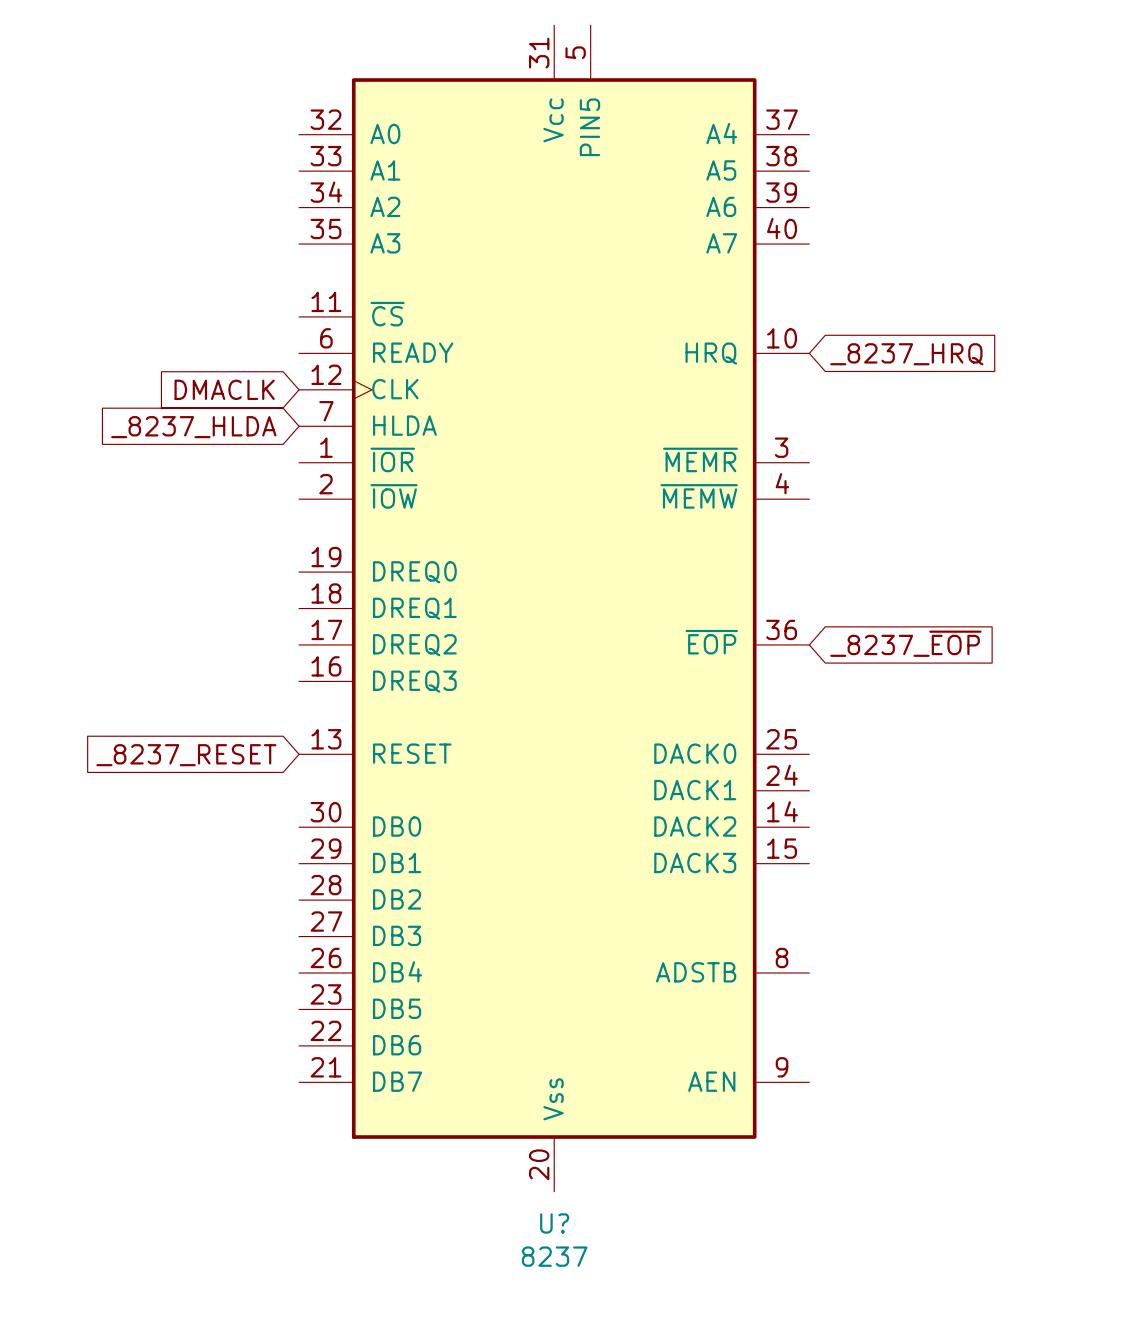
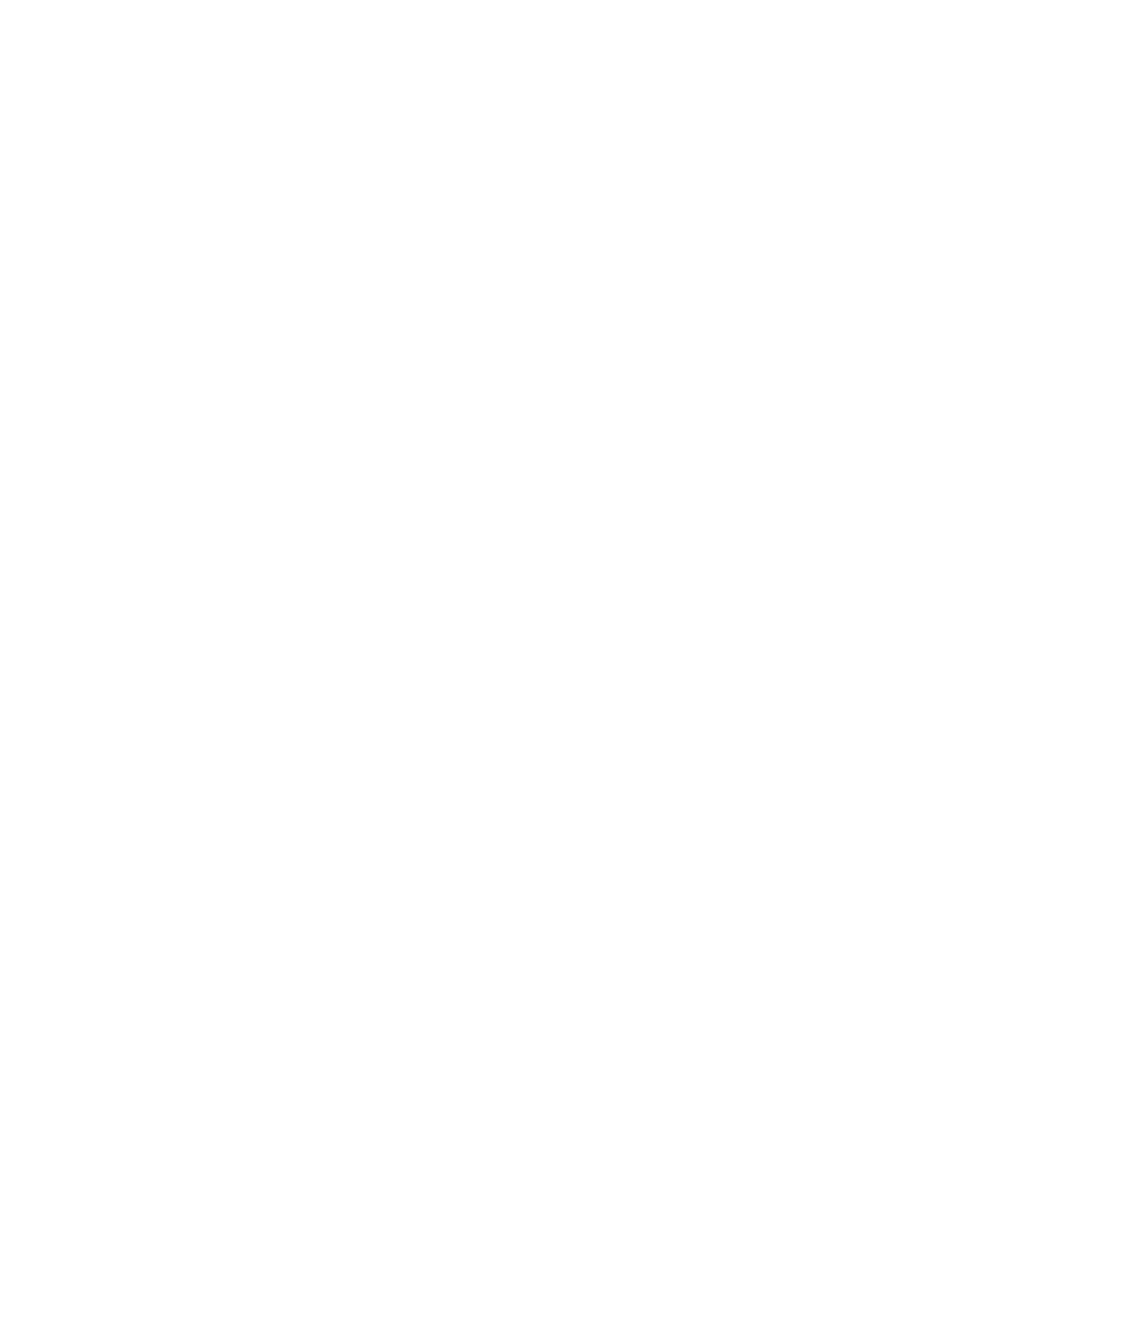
global label: _8237_HRQ (906, 354) -> none
global label: DMACLK (224, 389) -> none
global label: _8237_HLDA (193, 427) -> none
U?: 8237 (554, 608) -> none
global label: _8237_~{EOP} (905, 643) -> none
global label: _8237_RESET (186, 755) -> none

